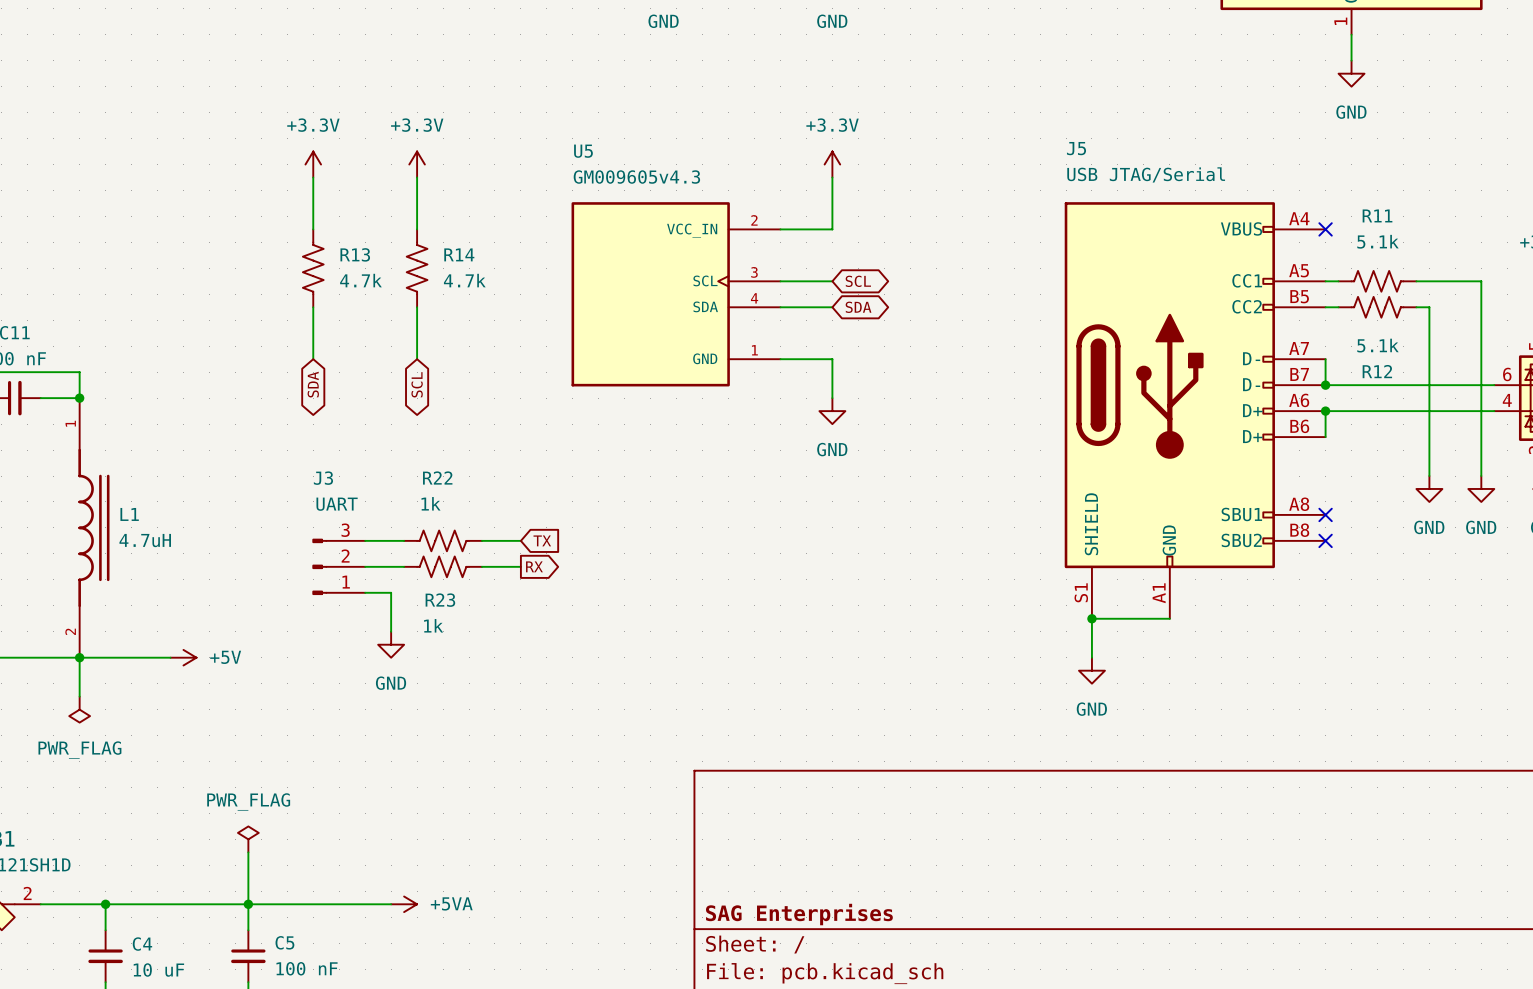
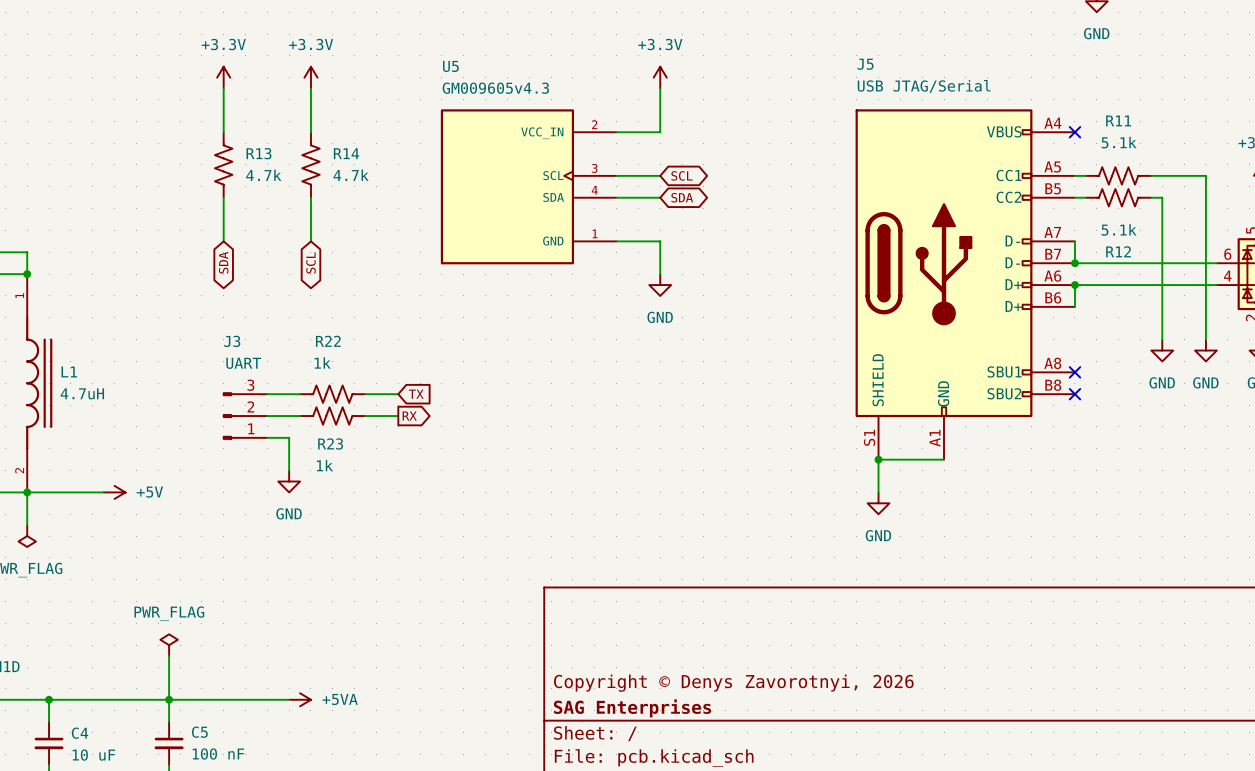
title block: none -> Copyright © Denys Zavorotnyi, 2026 (733, 683)

